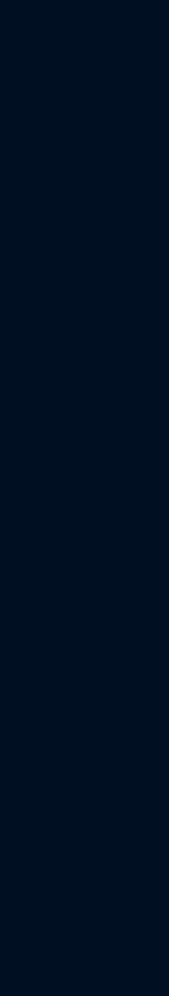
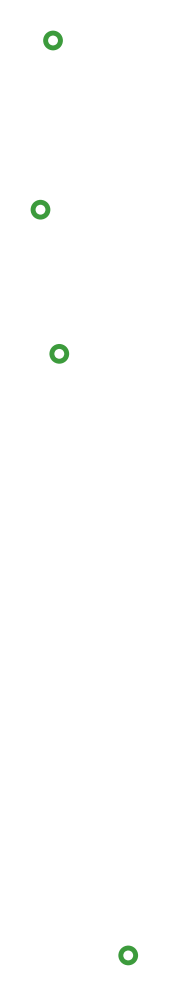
part: none -> (53, 40)
part: none -> (40, 209)
part: none -> (59, 353)
part: none -> (128, 955)

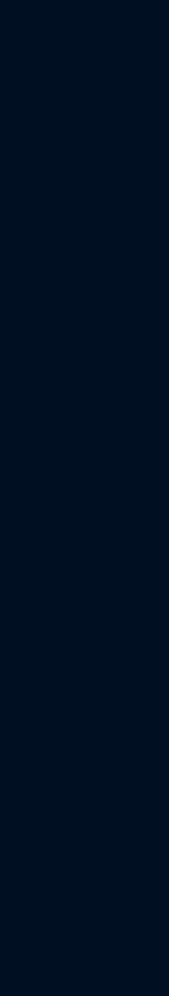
part: (53, 40) -> none
part: (40, 209) -> none
part: (59, 353) -> none
part: (128, 955) -> none

